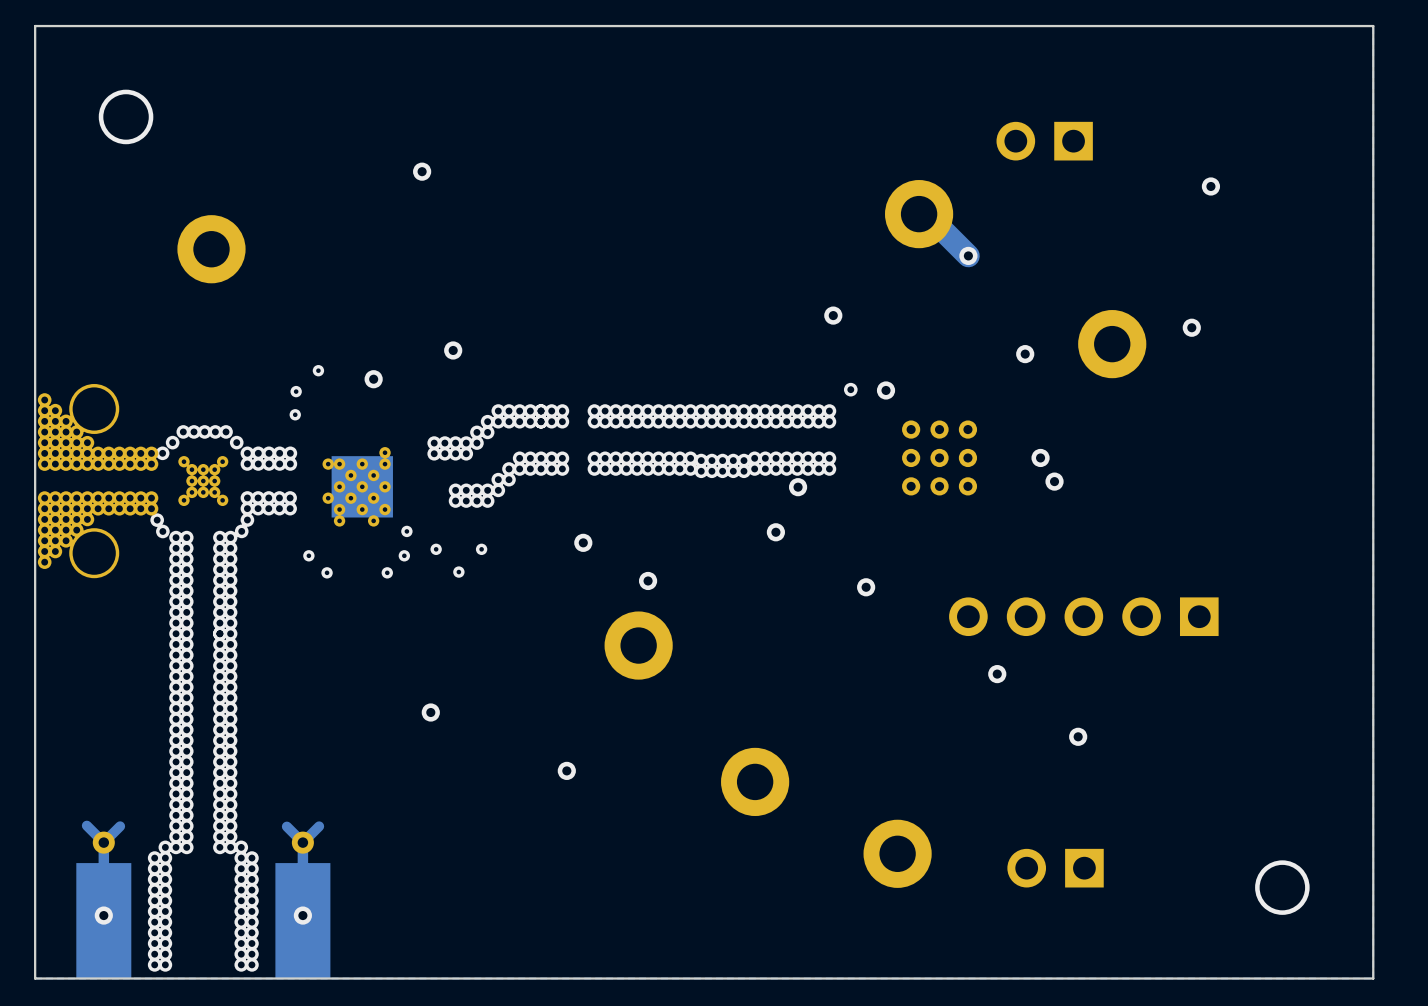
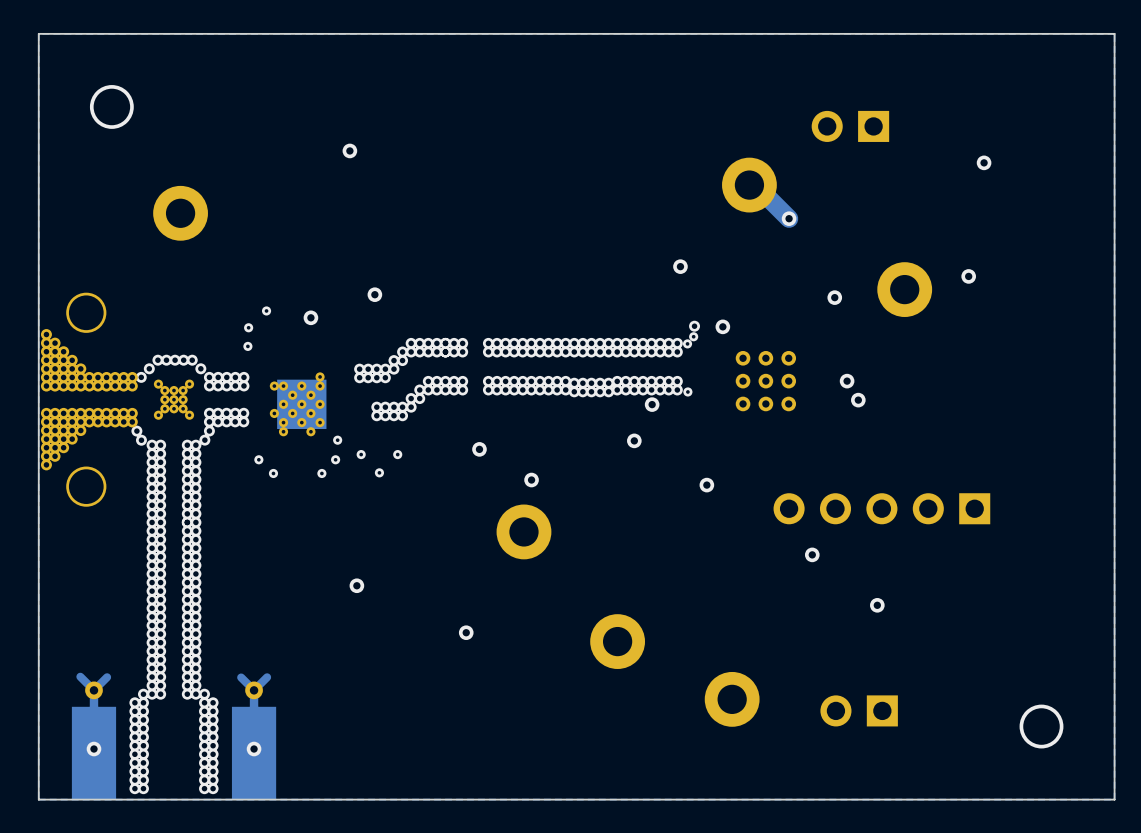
part footprint: [37, 383, 159, 579] -> [40, 292, 138, 507]
via: none -> (693, 336)
via: none -> (687, 343)
via: none -> (687, 391)

